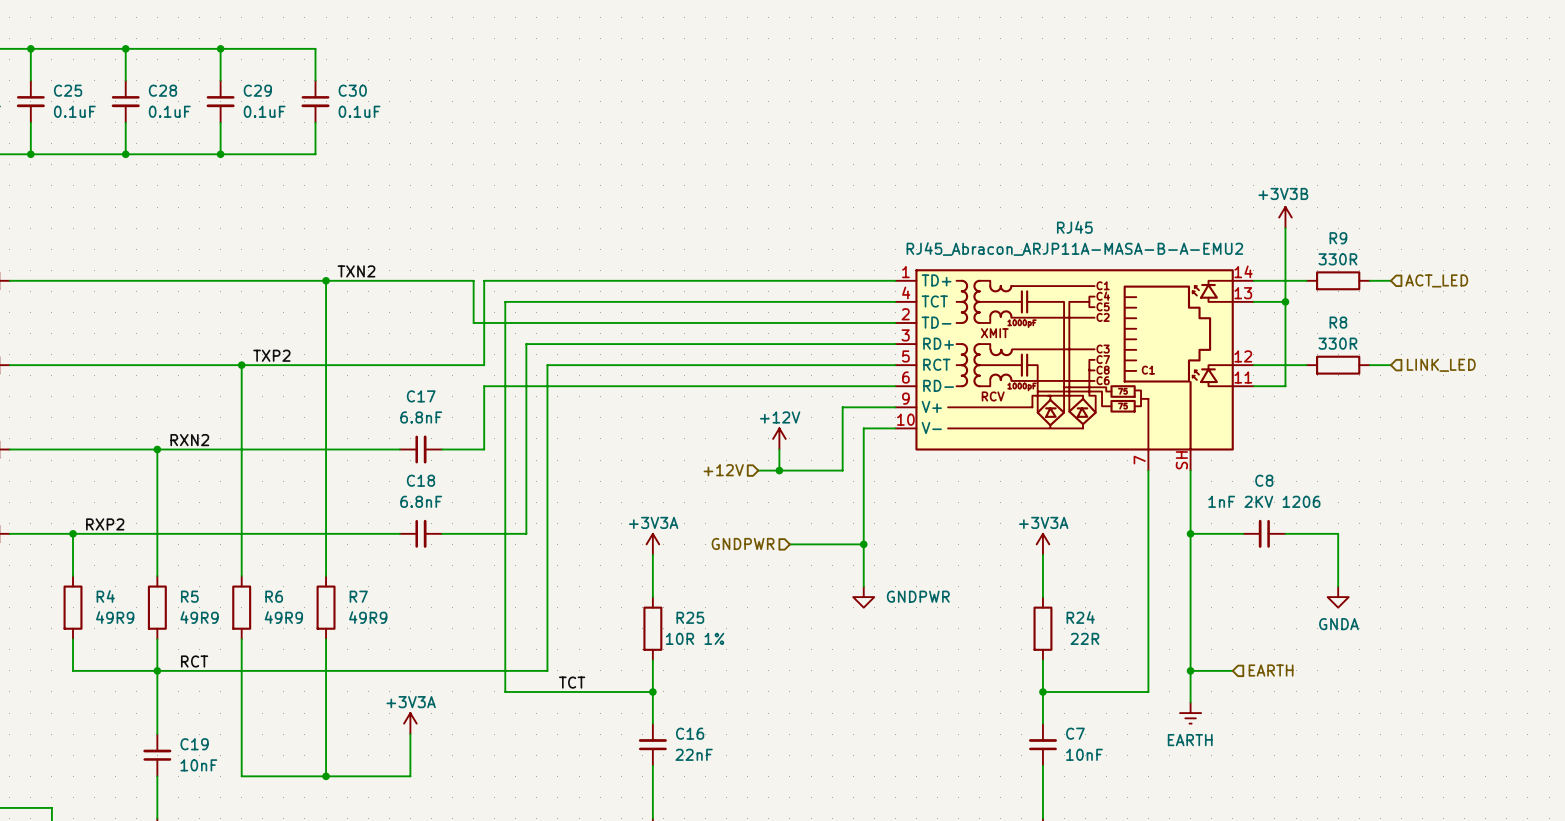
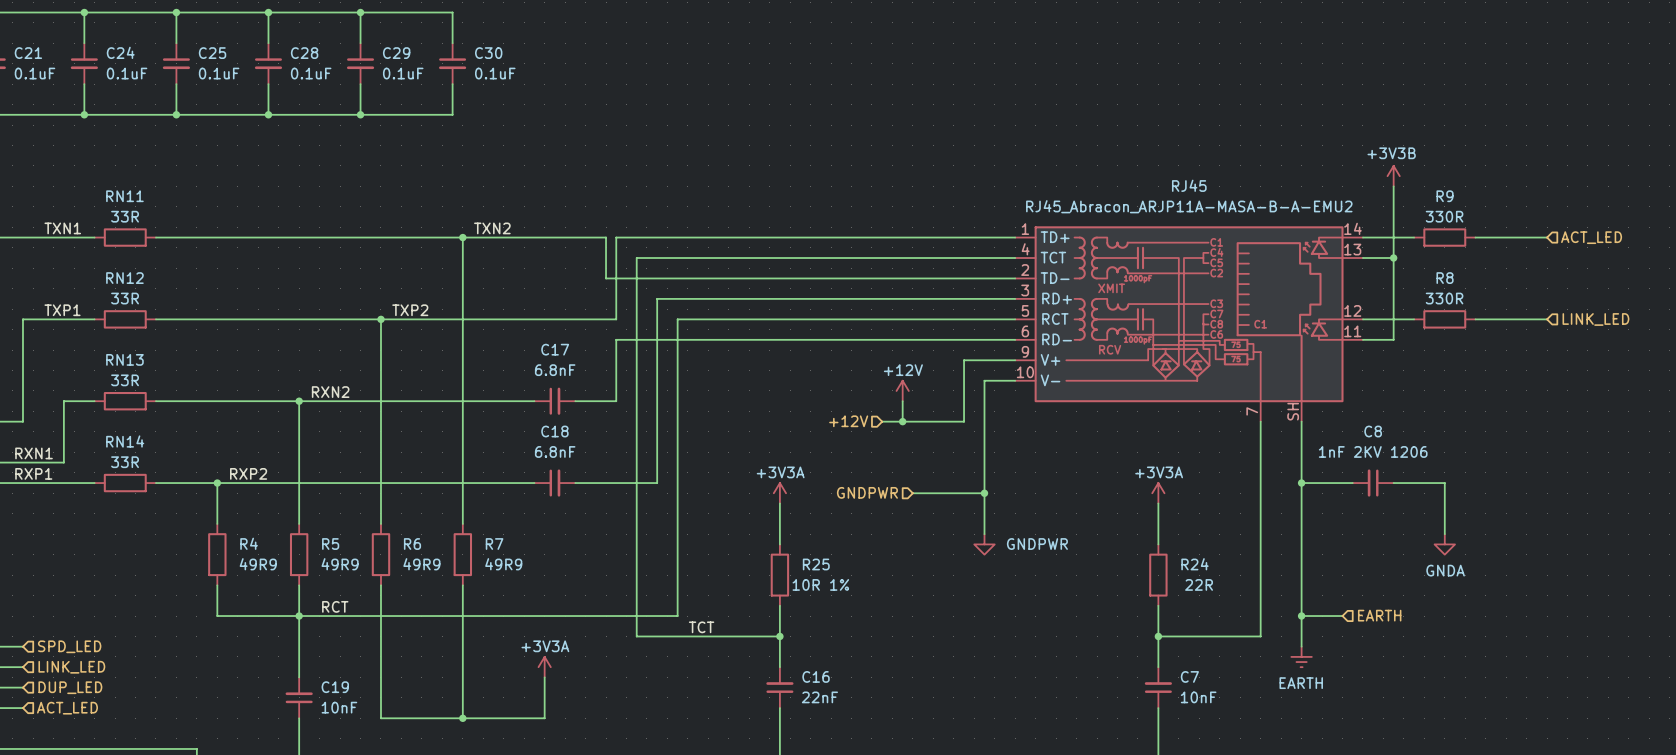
wire: none -> (1495, 237) (1547, 237)
hierarchical label position: ACT_LED (1436, 280) -> ACT_LED (1591, 237)
wire: none -> (1495, 319) (1547, 319)
hierarchical label position: LINK_LED (1441, 365) -> LINK_LED (1595, 319)

